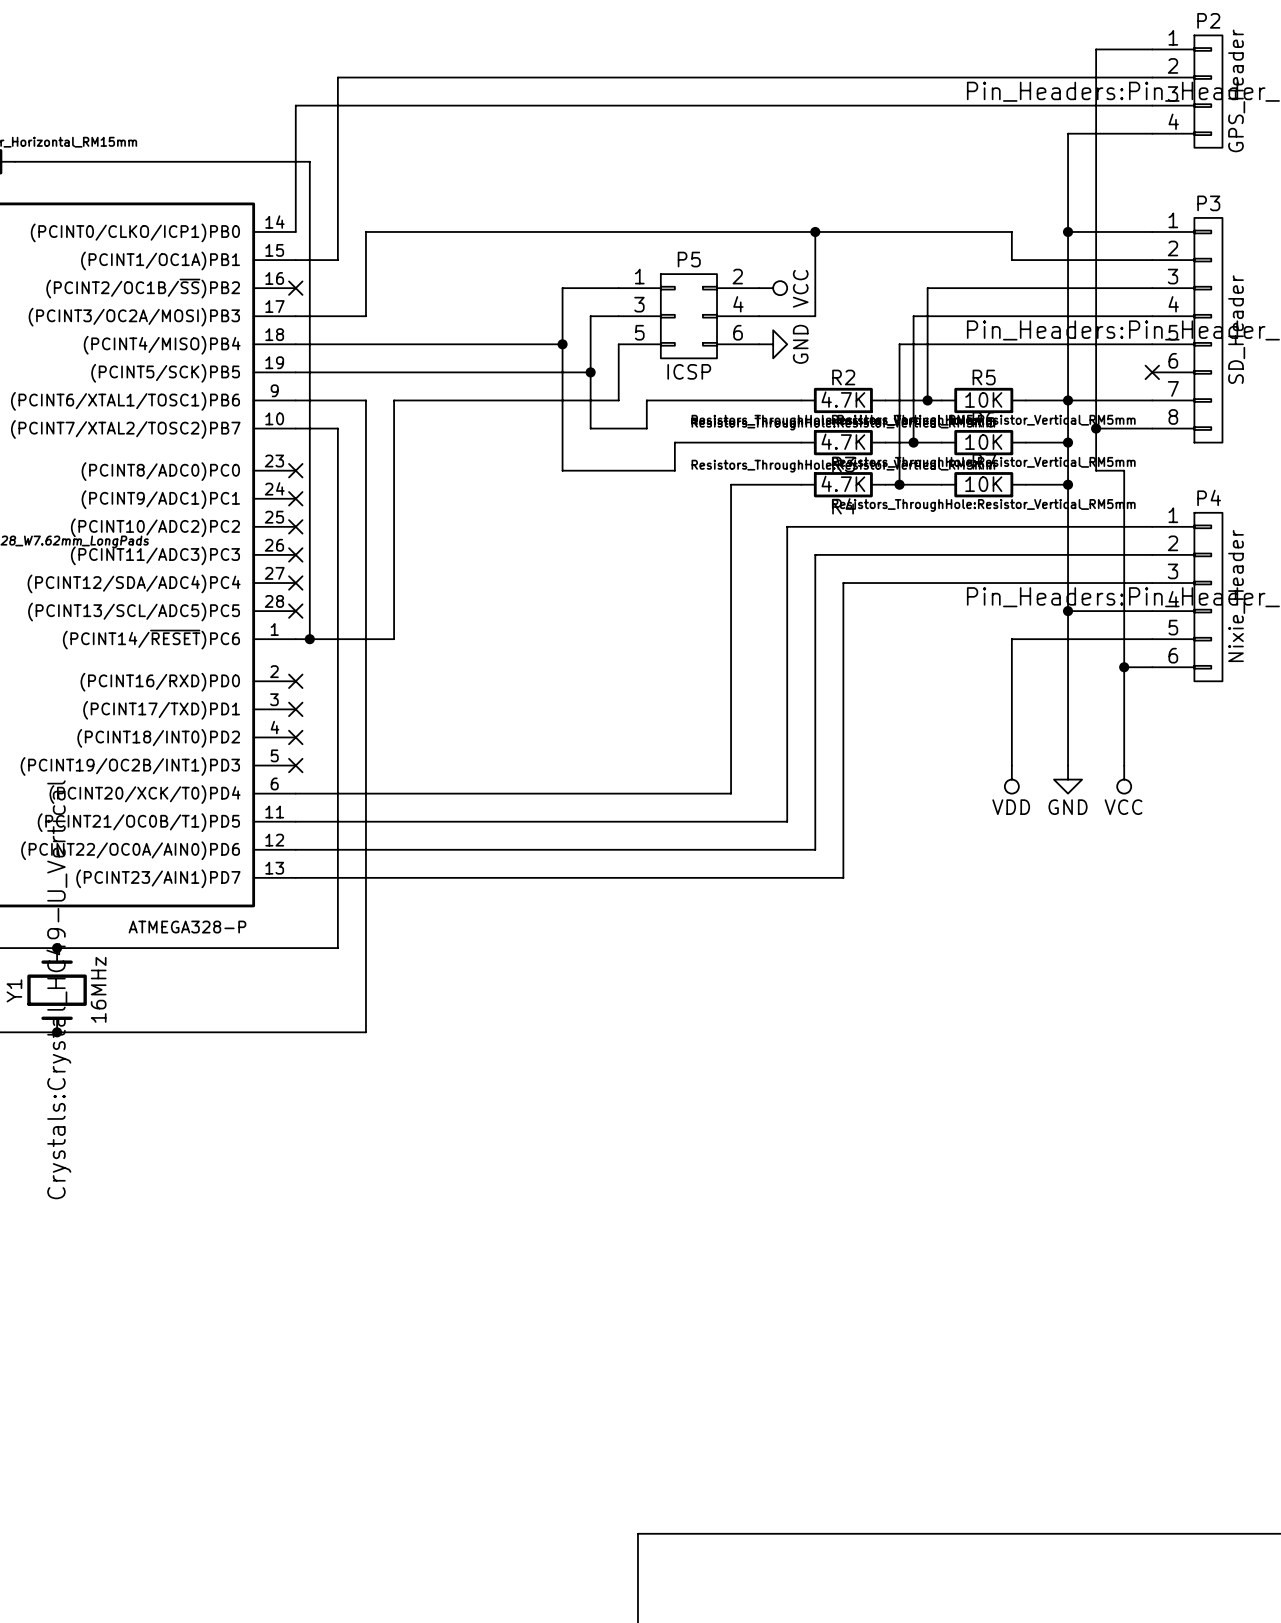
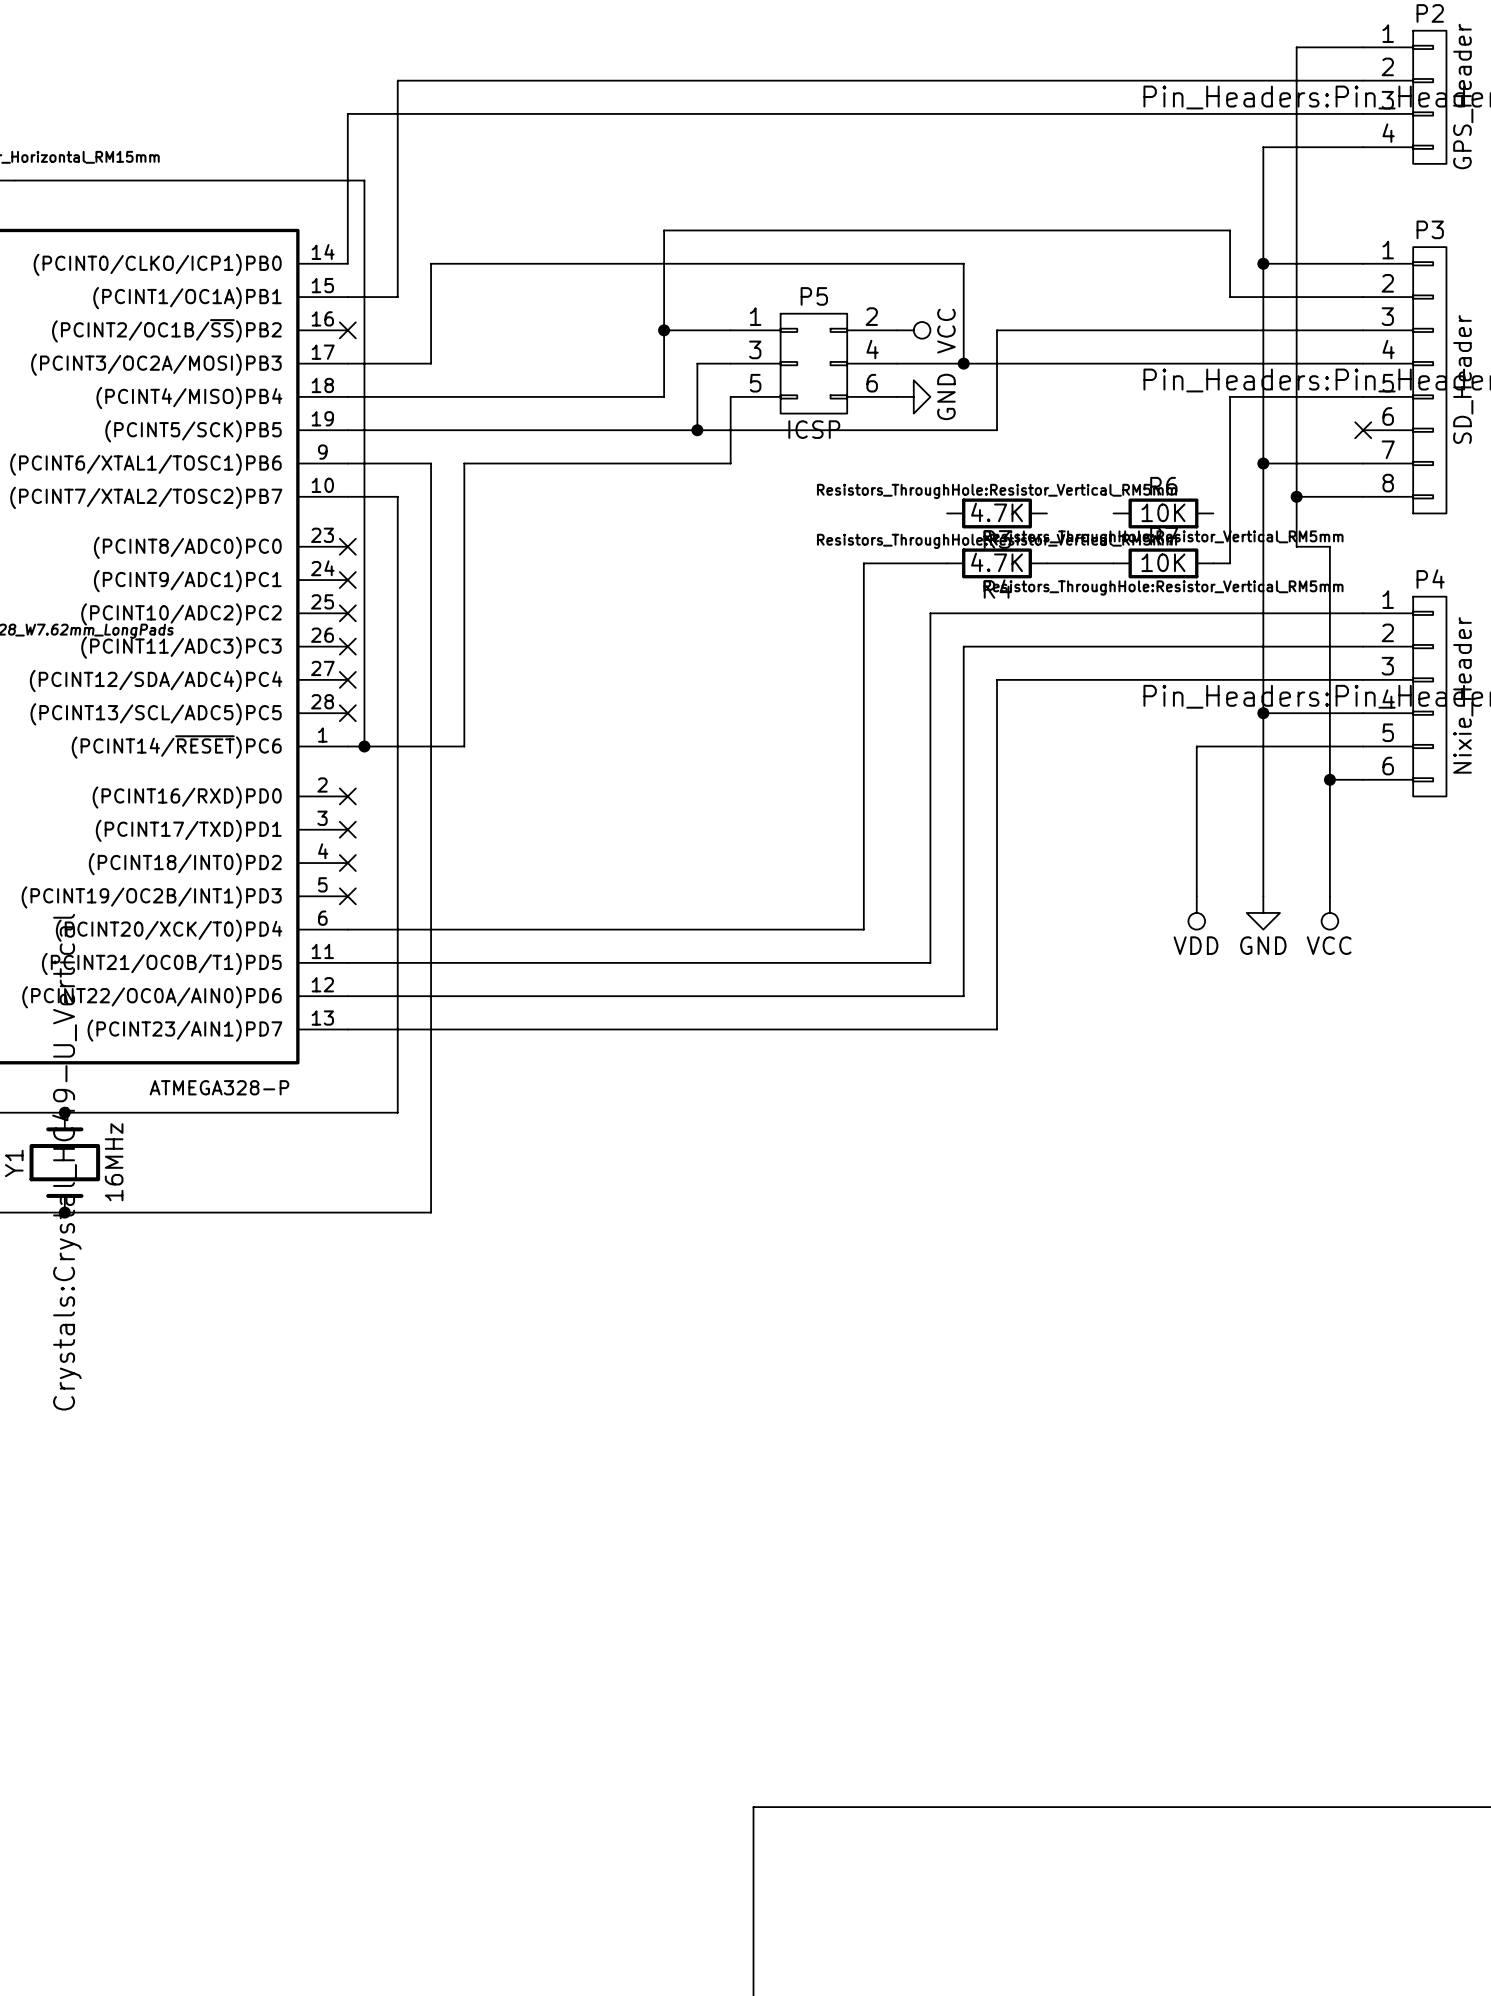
wire: (815, 231) (1011, 231) (1011, 260) (1039, 260) -> (664, 330) (664, 230) (1230, 230) (1230, 297)
junction: (815, 231) -> none
wire: (927, 288) (927, 400) -> none
junction: none -> (963, 363)
wire: (913, 316) (913, 442) -> (1080, 363) (963, 363)
wire: (562, 344) (562, 470) (674, 470) (674, 442) (801, 442) -> none
junction position: (562, 344) -> (664, 330)
wire: (1039, 344) (899, 344) (899, 484) -> (1230, 396) (1230, 563)
wire: (590, 372) (590, 428) (646, 428) (646, 400) (801, 400) -> (697, 430) (997, 430) (997, 330) (1096, 330)
R2: 4.7K (843, 400) -> none
wire: (885, 400) (941, 400) -> none
junction: (927, 400) -> none
R5: 10K (983, 400) -> none
wire: (1025, 400) (1068, 400) -> none
wire: (885, 442) (941, 442) -> none
junction: (913, 442) -> none
wire: (1025, 442) (1068, 442) -> none
junction: (1068, 442) -> none
junction: (899, 484) -> none
wire: (1039, 484) (1068, 484) -> none
junction: (1068, 484) -> none

